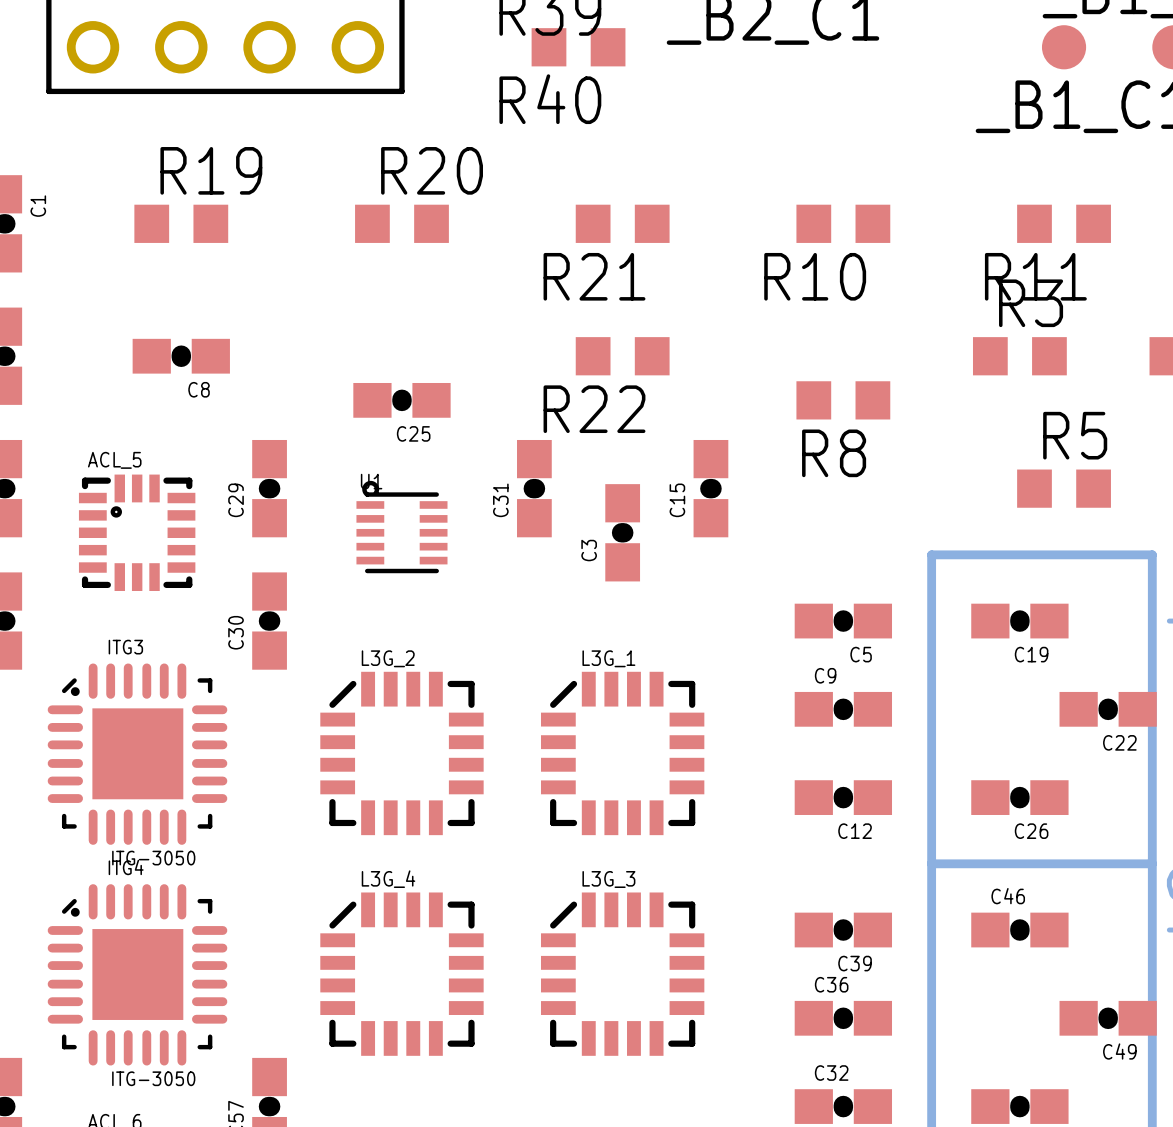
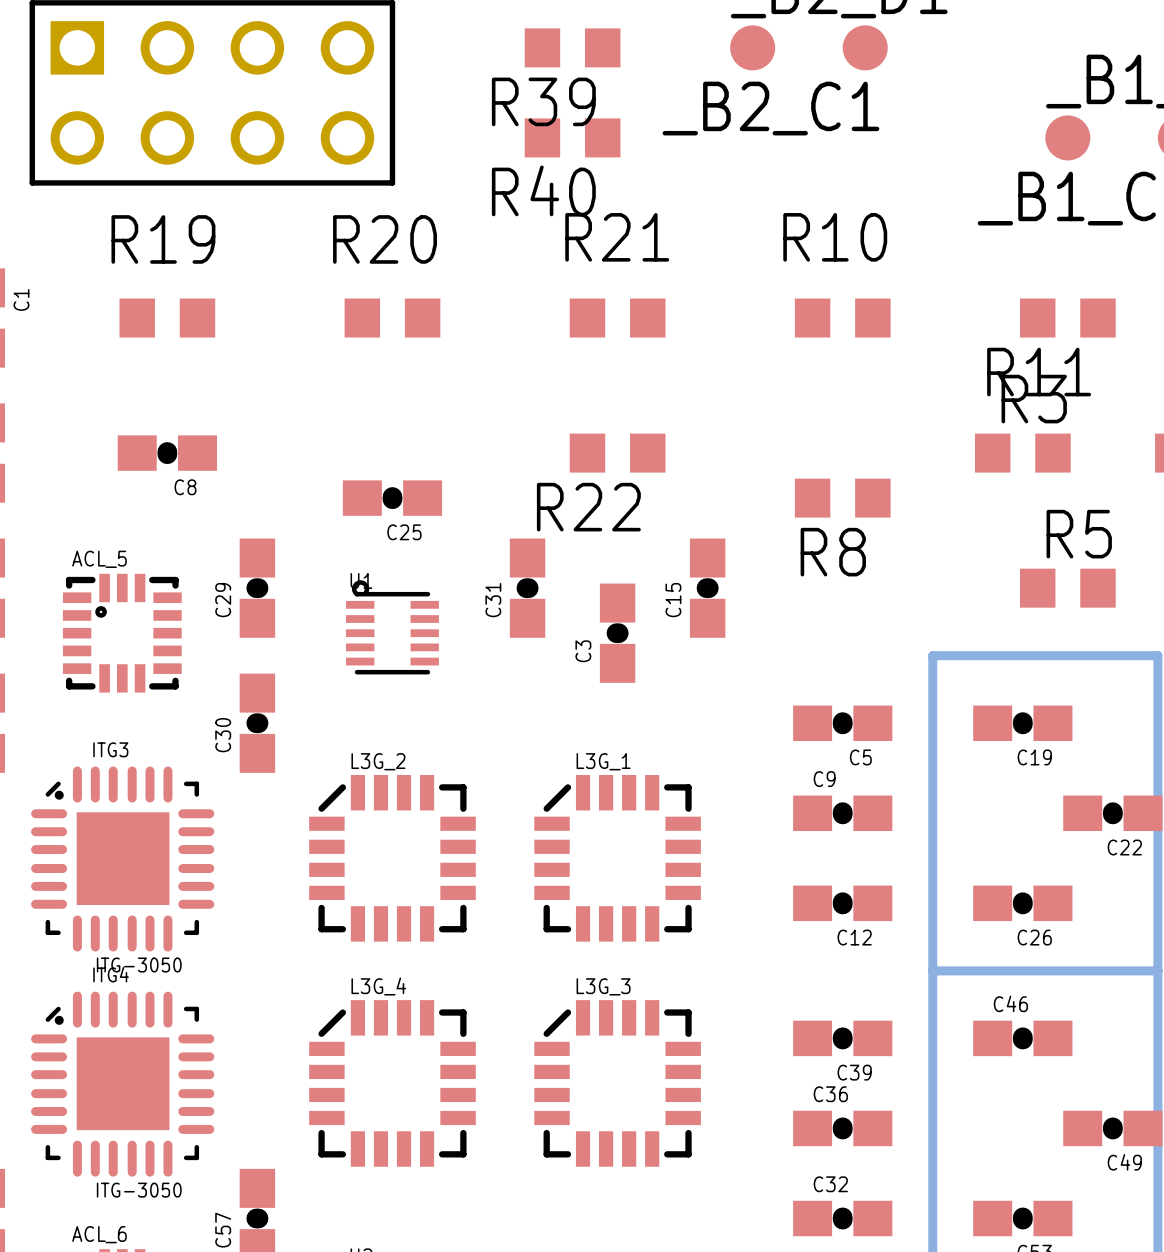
R19 name position: R19 (211, 170) -> R19 (163, 239)
R20 name position: R20 (432, 170) -> R20 (385, 239)
R21 name position: R21 (594, 276) -> R21 (617, 237)
R10 name position: R10 (815, 276) -> R10 (835, 237)

